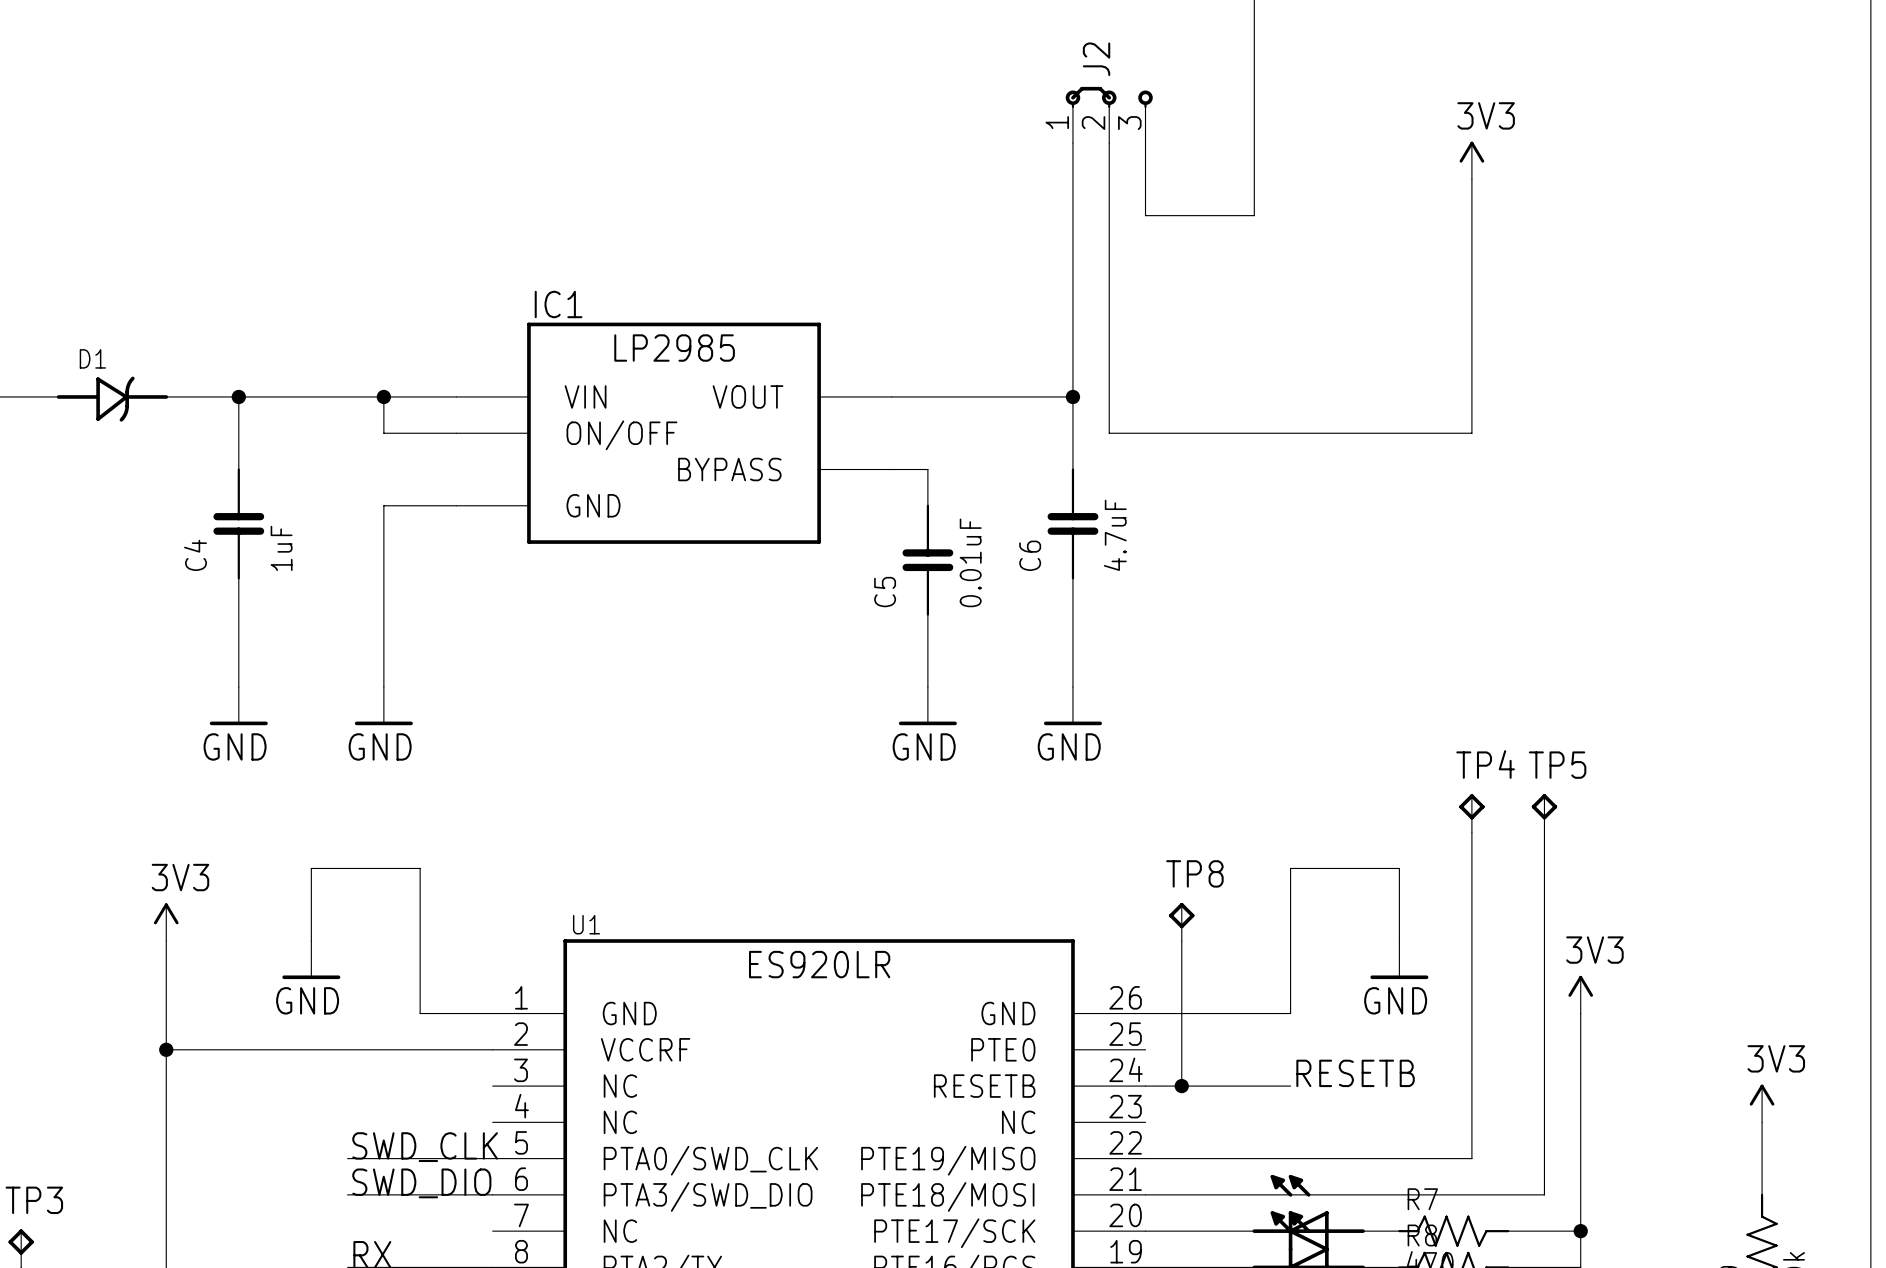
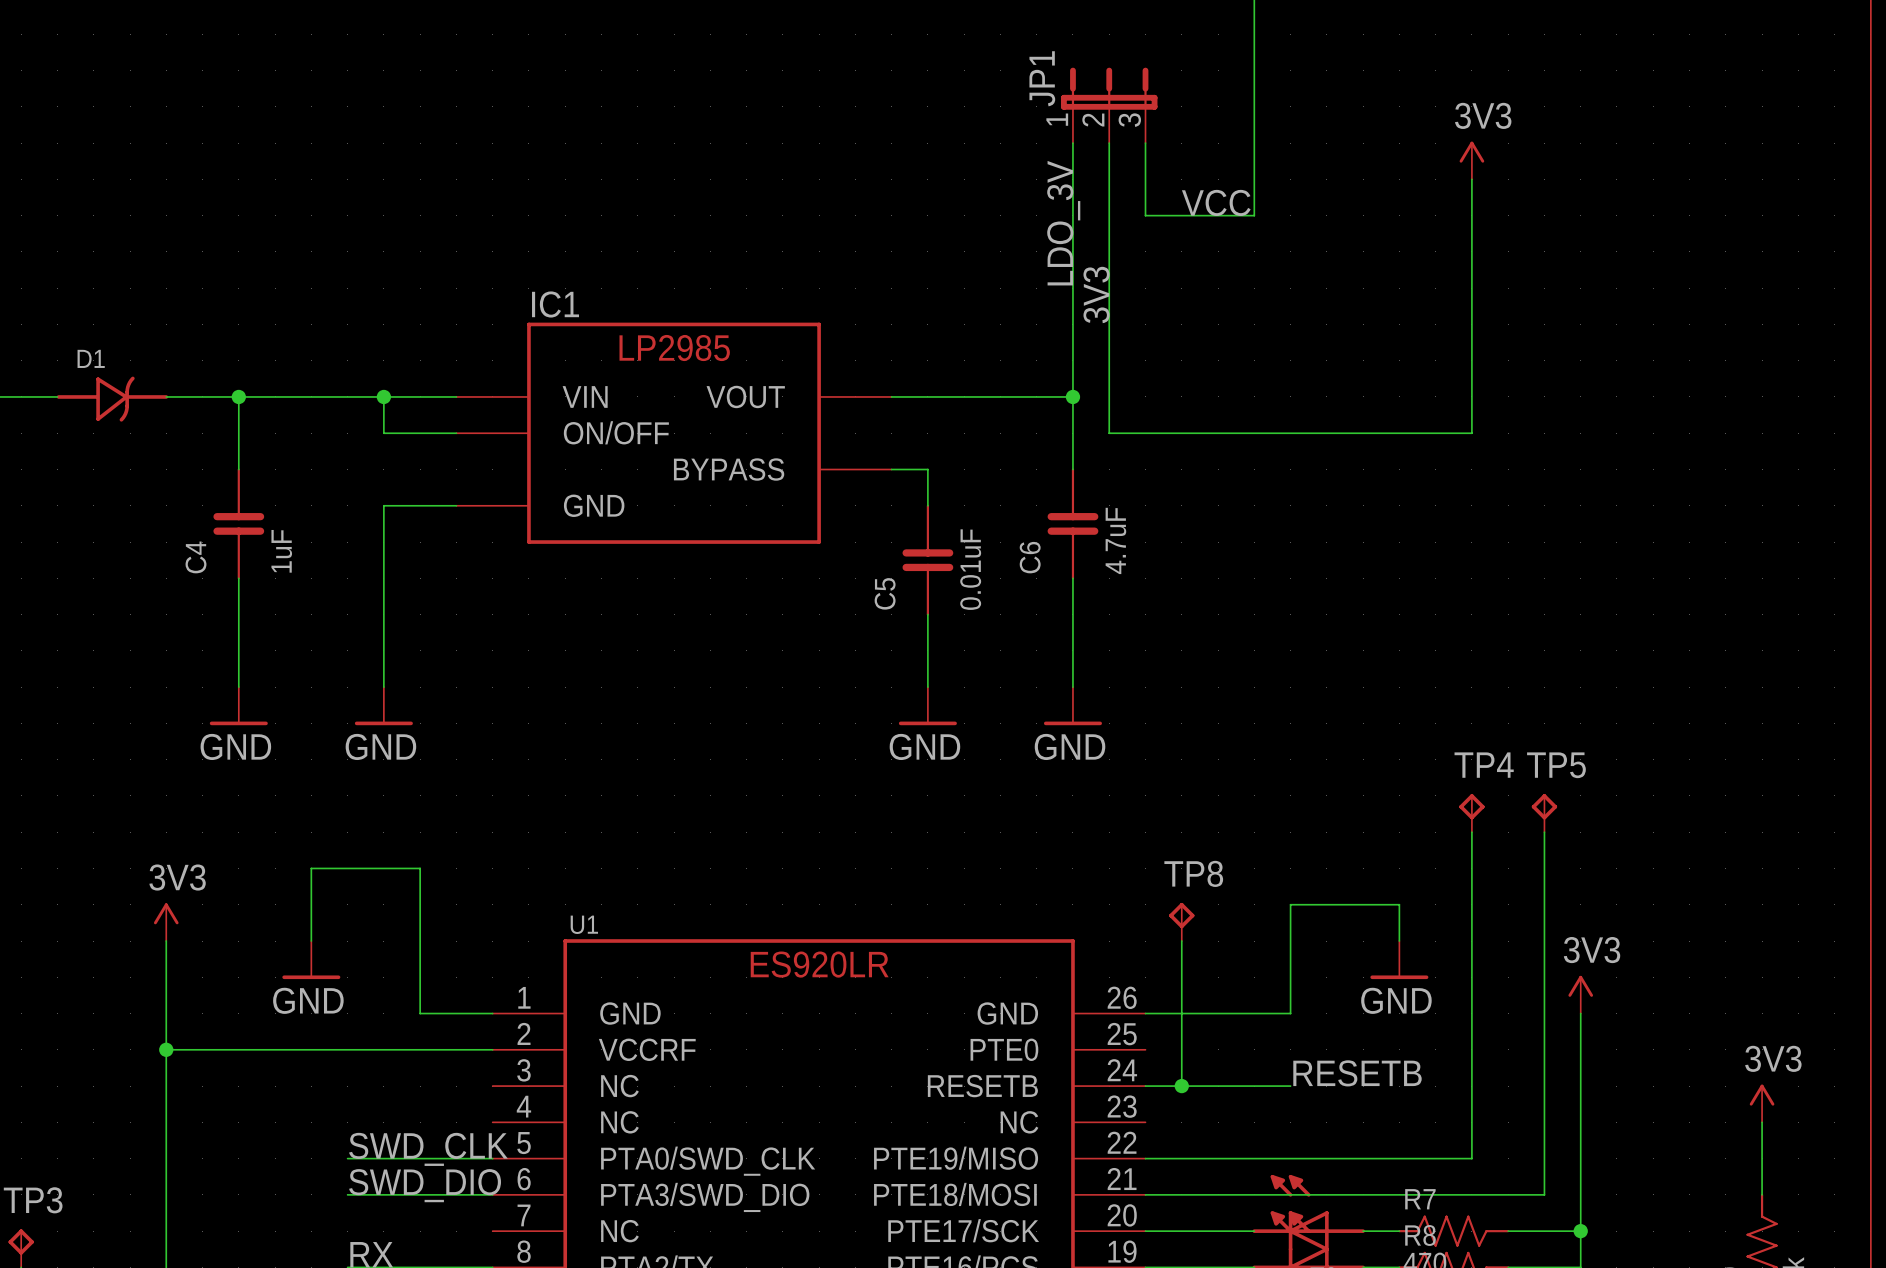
JP1: none -> (1109, 105)
J2: (1109, 114) -> none
label: none -> VCC (1216, 202)
label: none -> LDO_3V (1063, 223)
label: none -> 3V3 (1096, 294)
wire: (1290, 904) (1290, 868) (1399, 868) (1399, 904) -> (1290, 904) (1399, 904)

